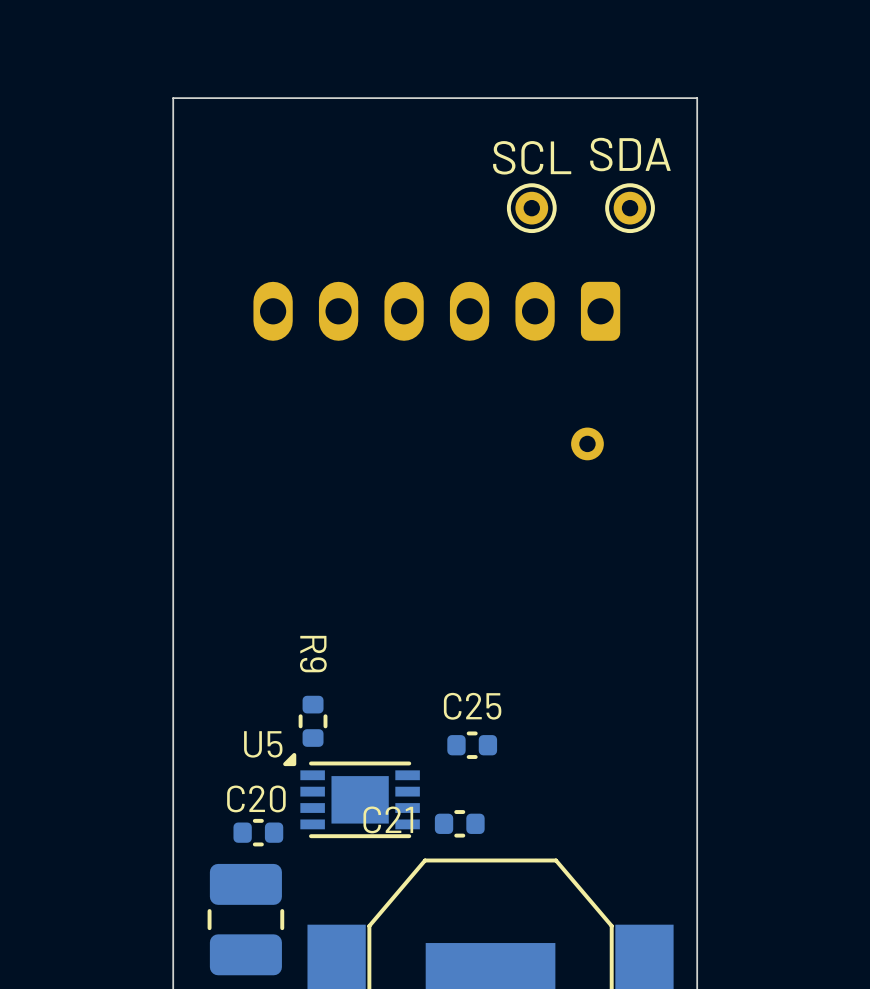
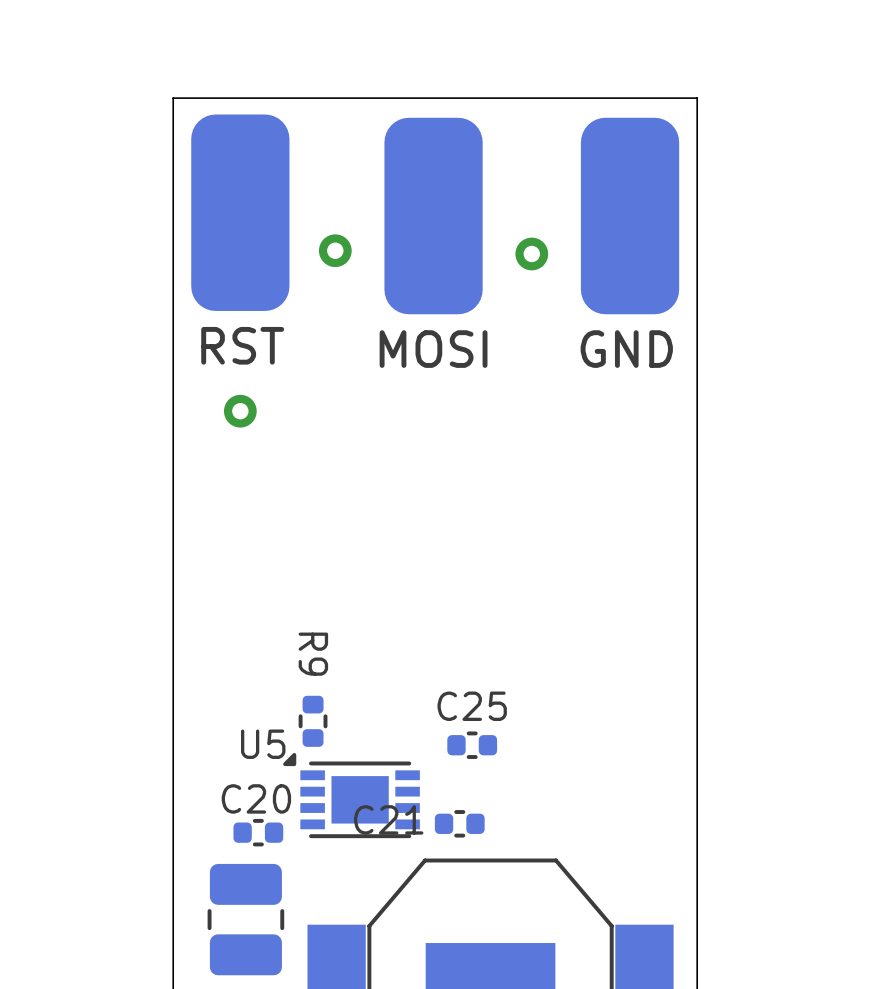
part value: SDA (630, 154) -> GND (626, 349)
part footprint: [605, 183, 655, 234] -> [580, 117, 680, 315]
part side: bottom (531, 208) -> top (335, 250)
part: none -> RST (240, 212)
part: none -> MOSI (433, 216)
part: none -> (531, 253)
part: (436, 311) -> none
part: none -> (240, 411)
part: (587, 443) -> none

